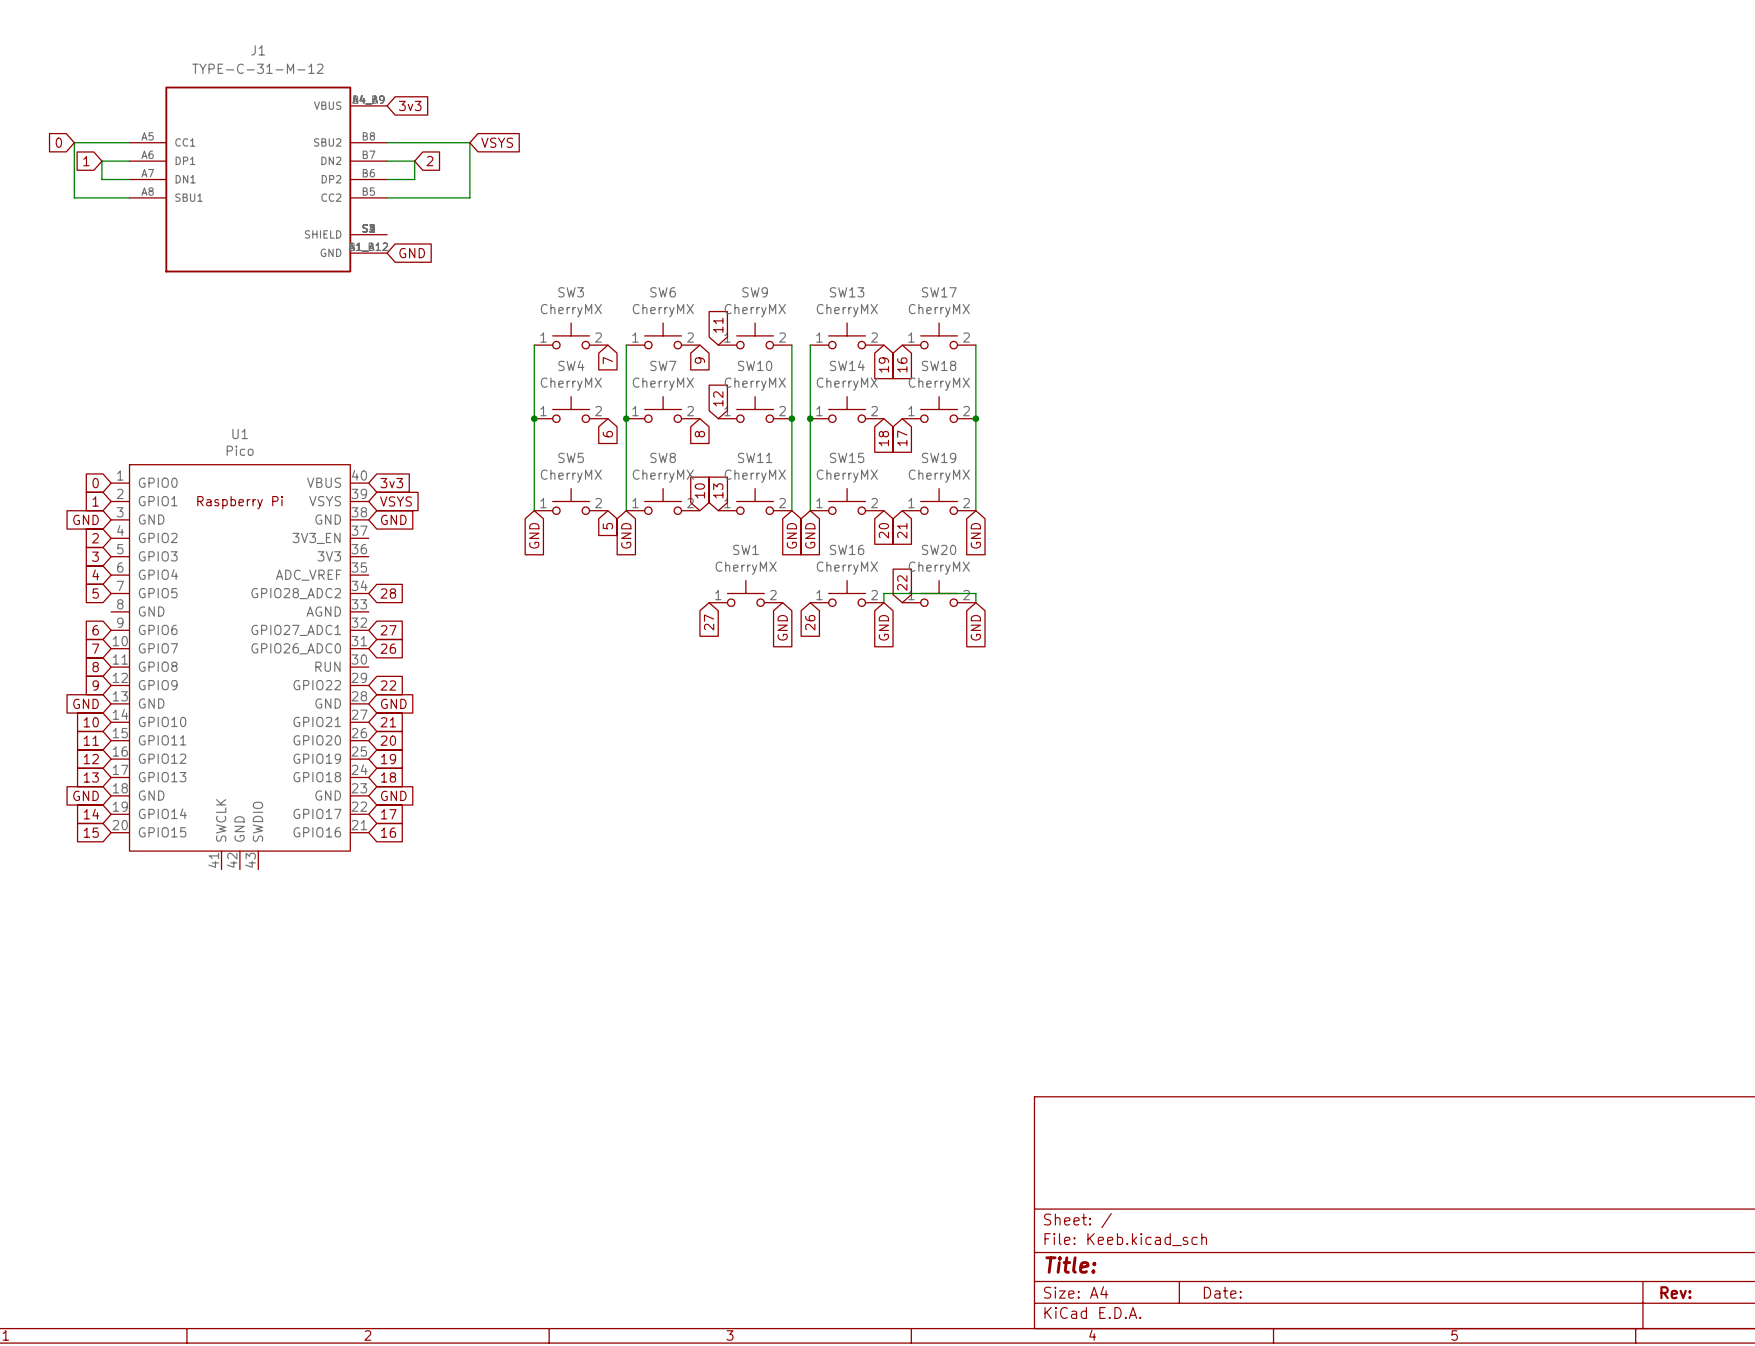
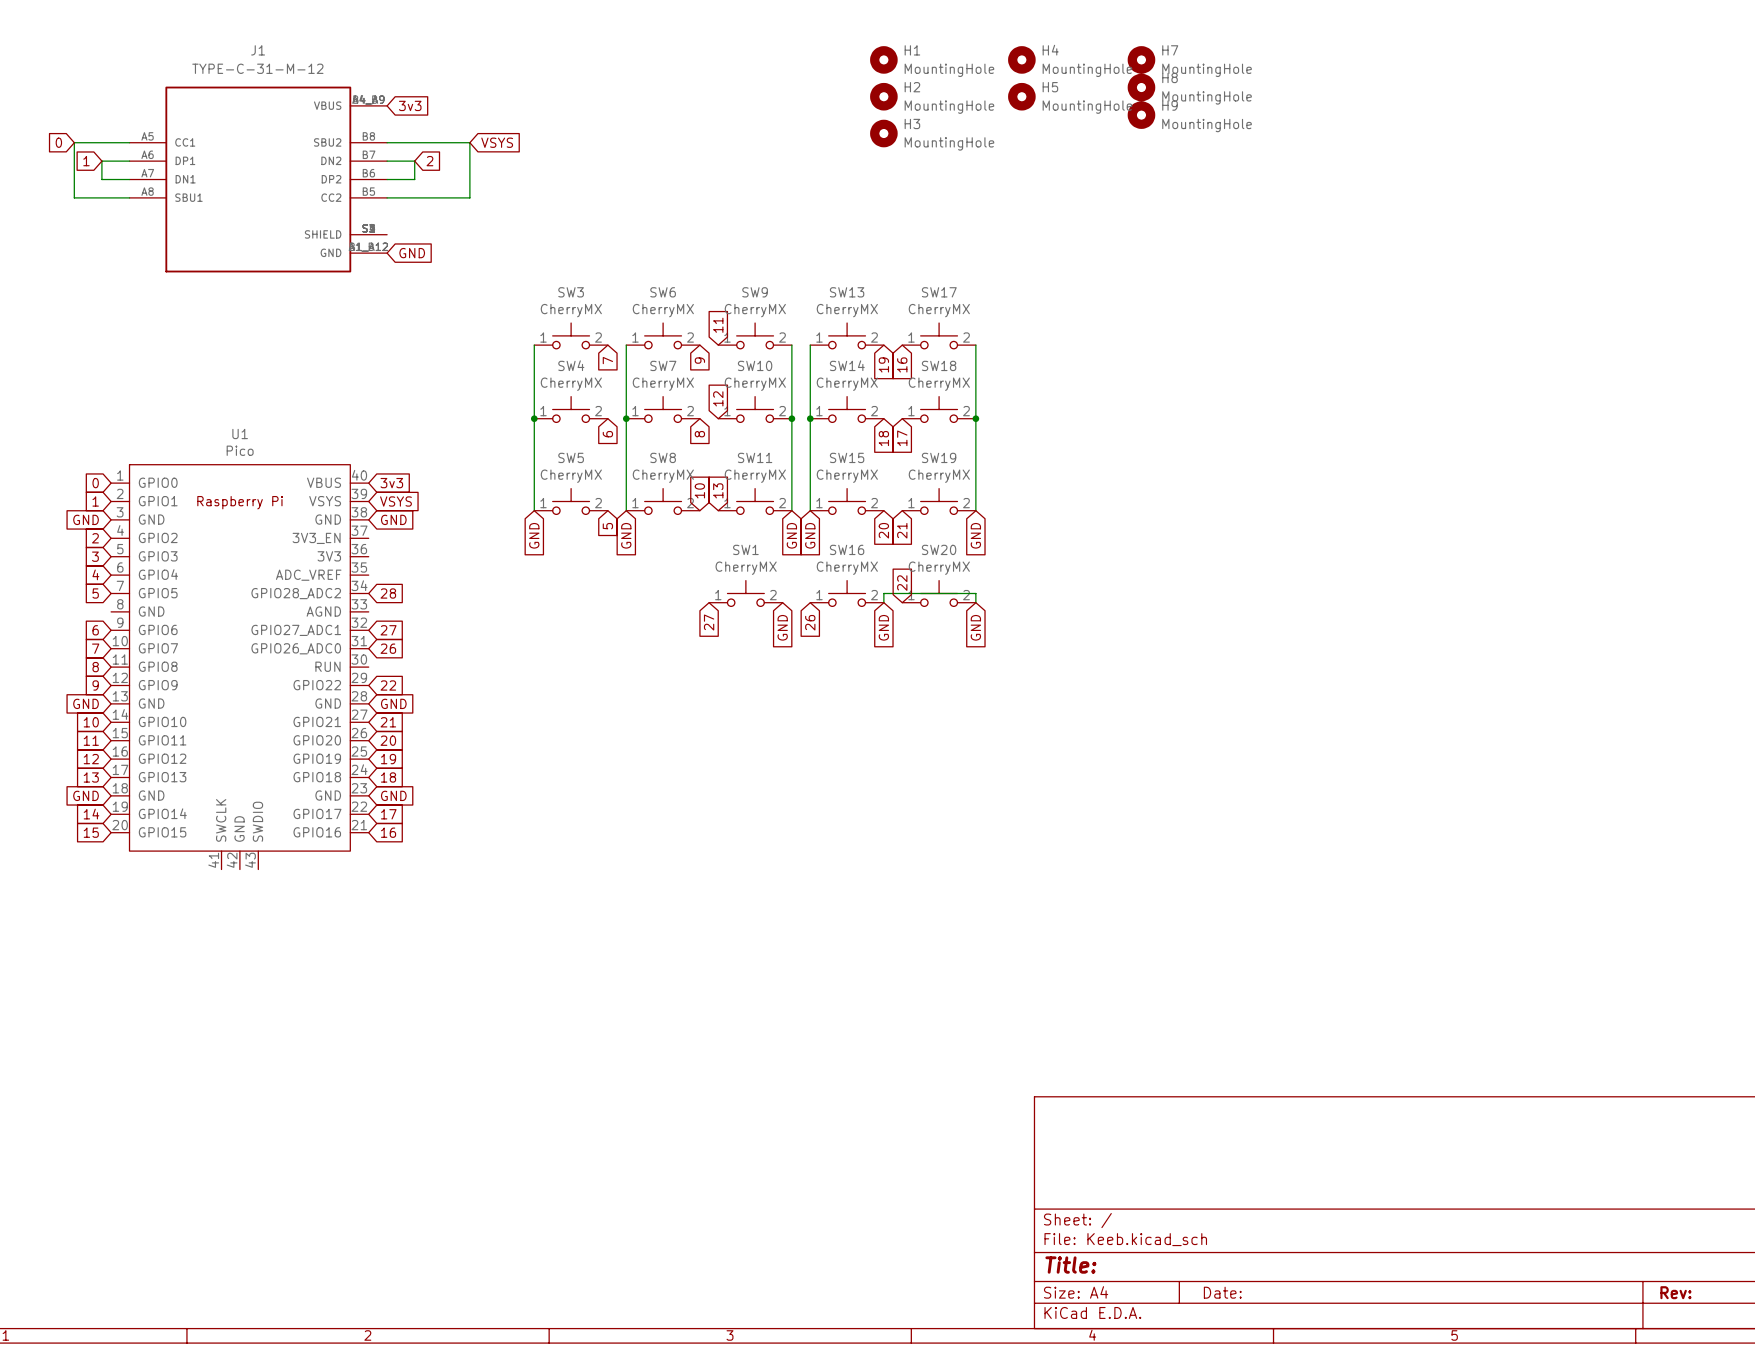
H1: none -> MountingHole (883, 59)
H4: none -> MountingHole (1021, 59)
H7: none -> MountingHole (1141, 59)
H8: none -> MountingHole (1141, 87)
H2: none -> MountingHole (883, 96)
H5: none -> MountingHole (1021, 96)
H9: none -> MountingHole (1141, 115)
H3: none -> MountingHole (883, 133)

